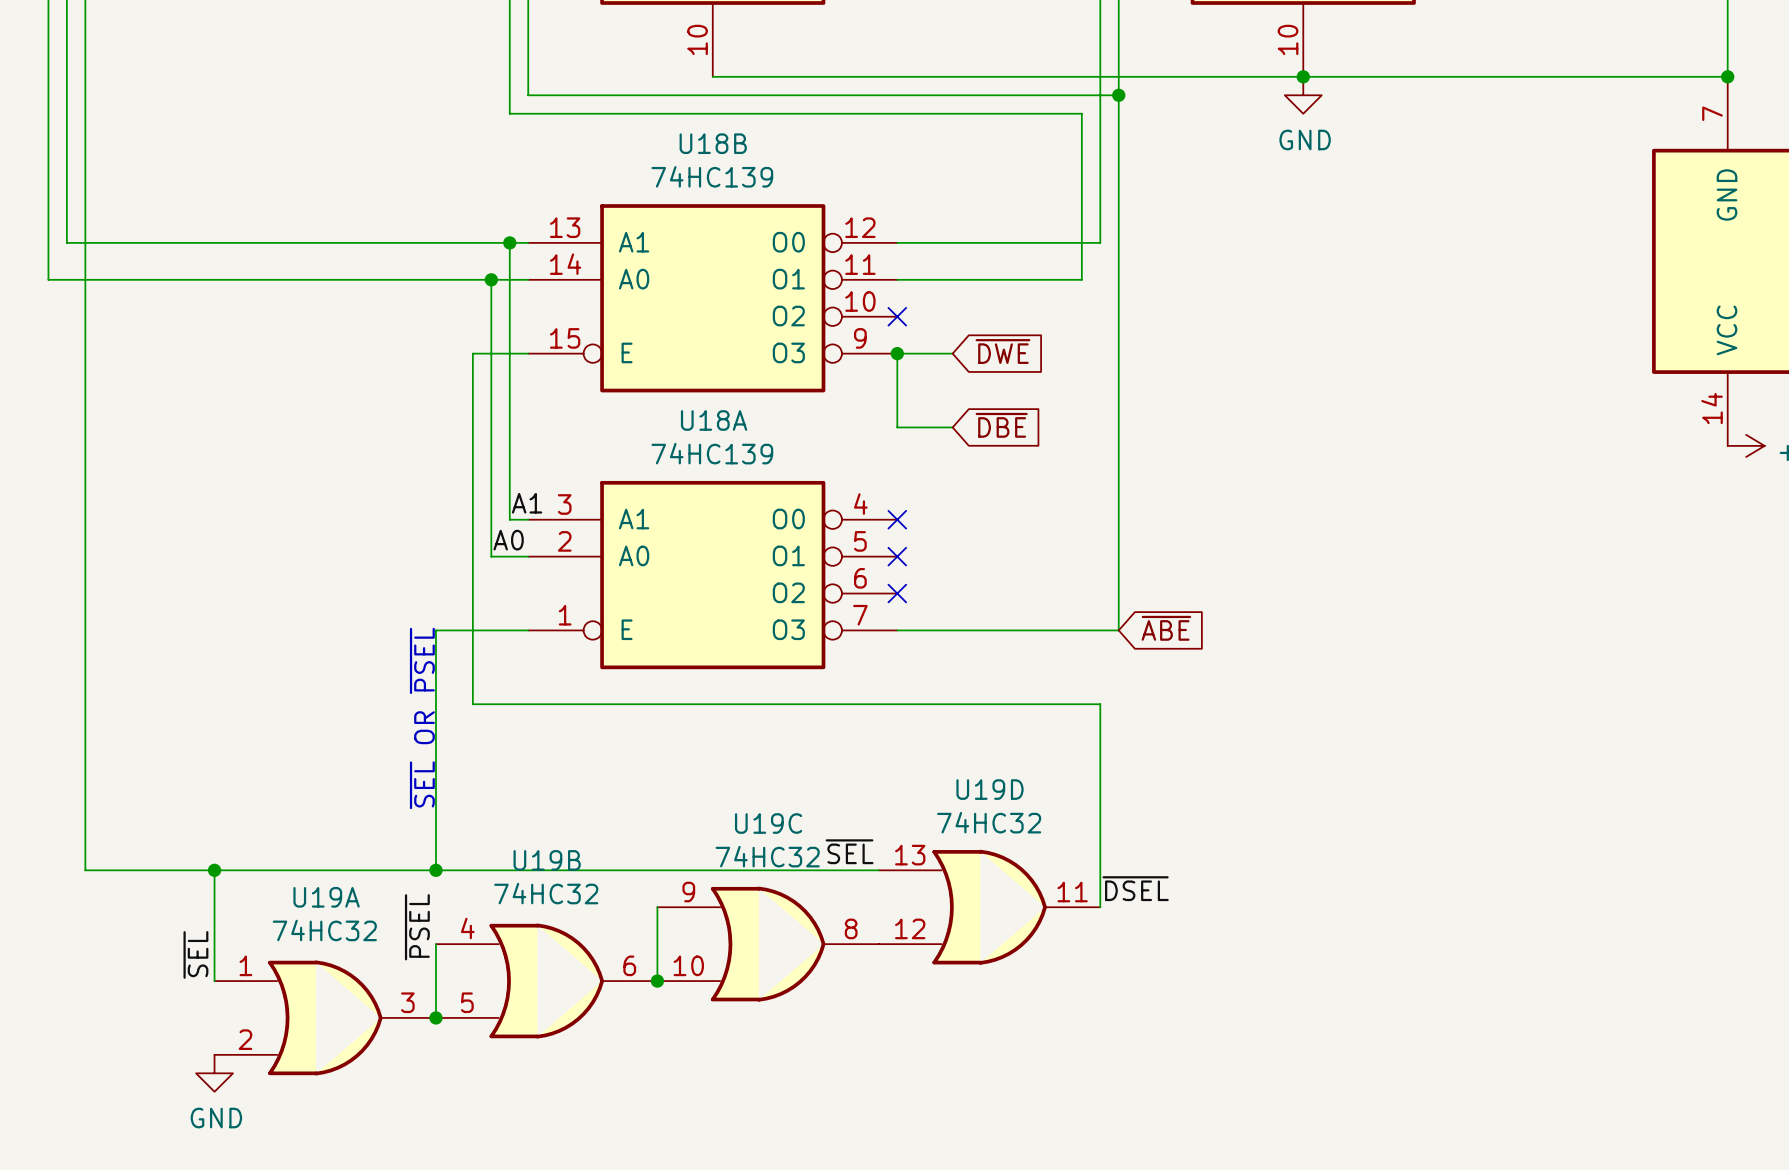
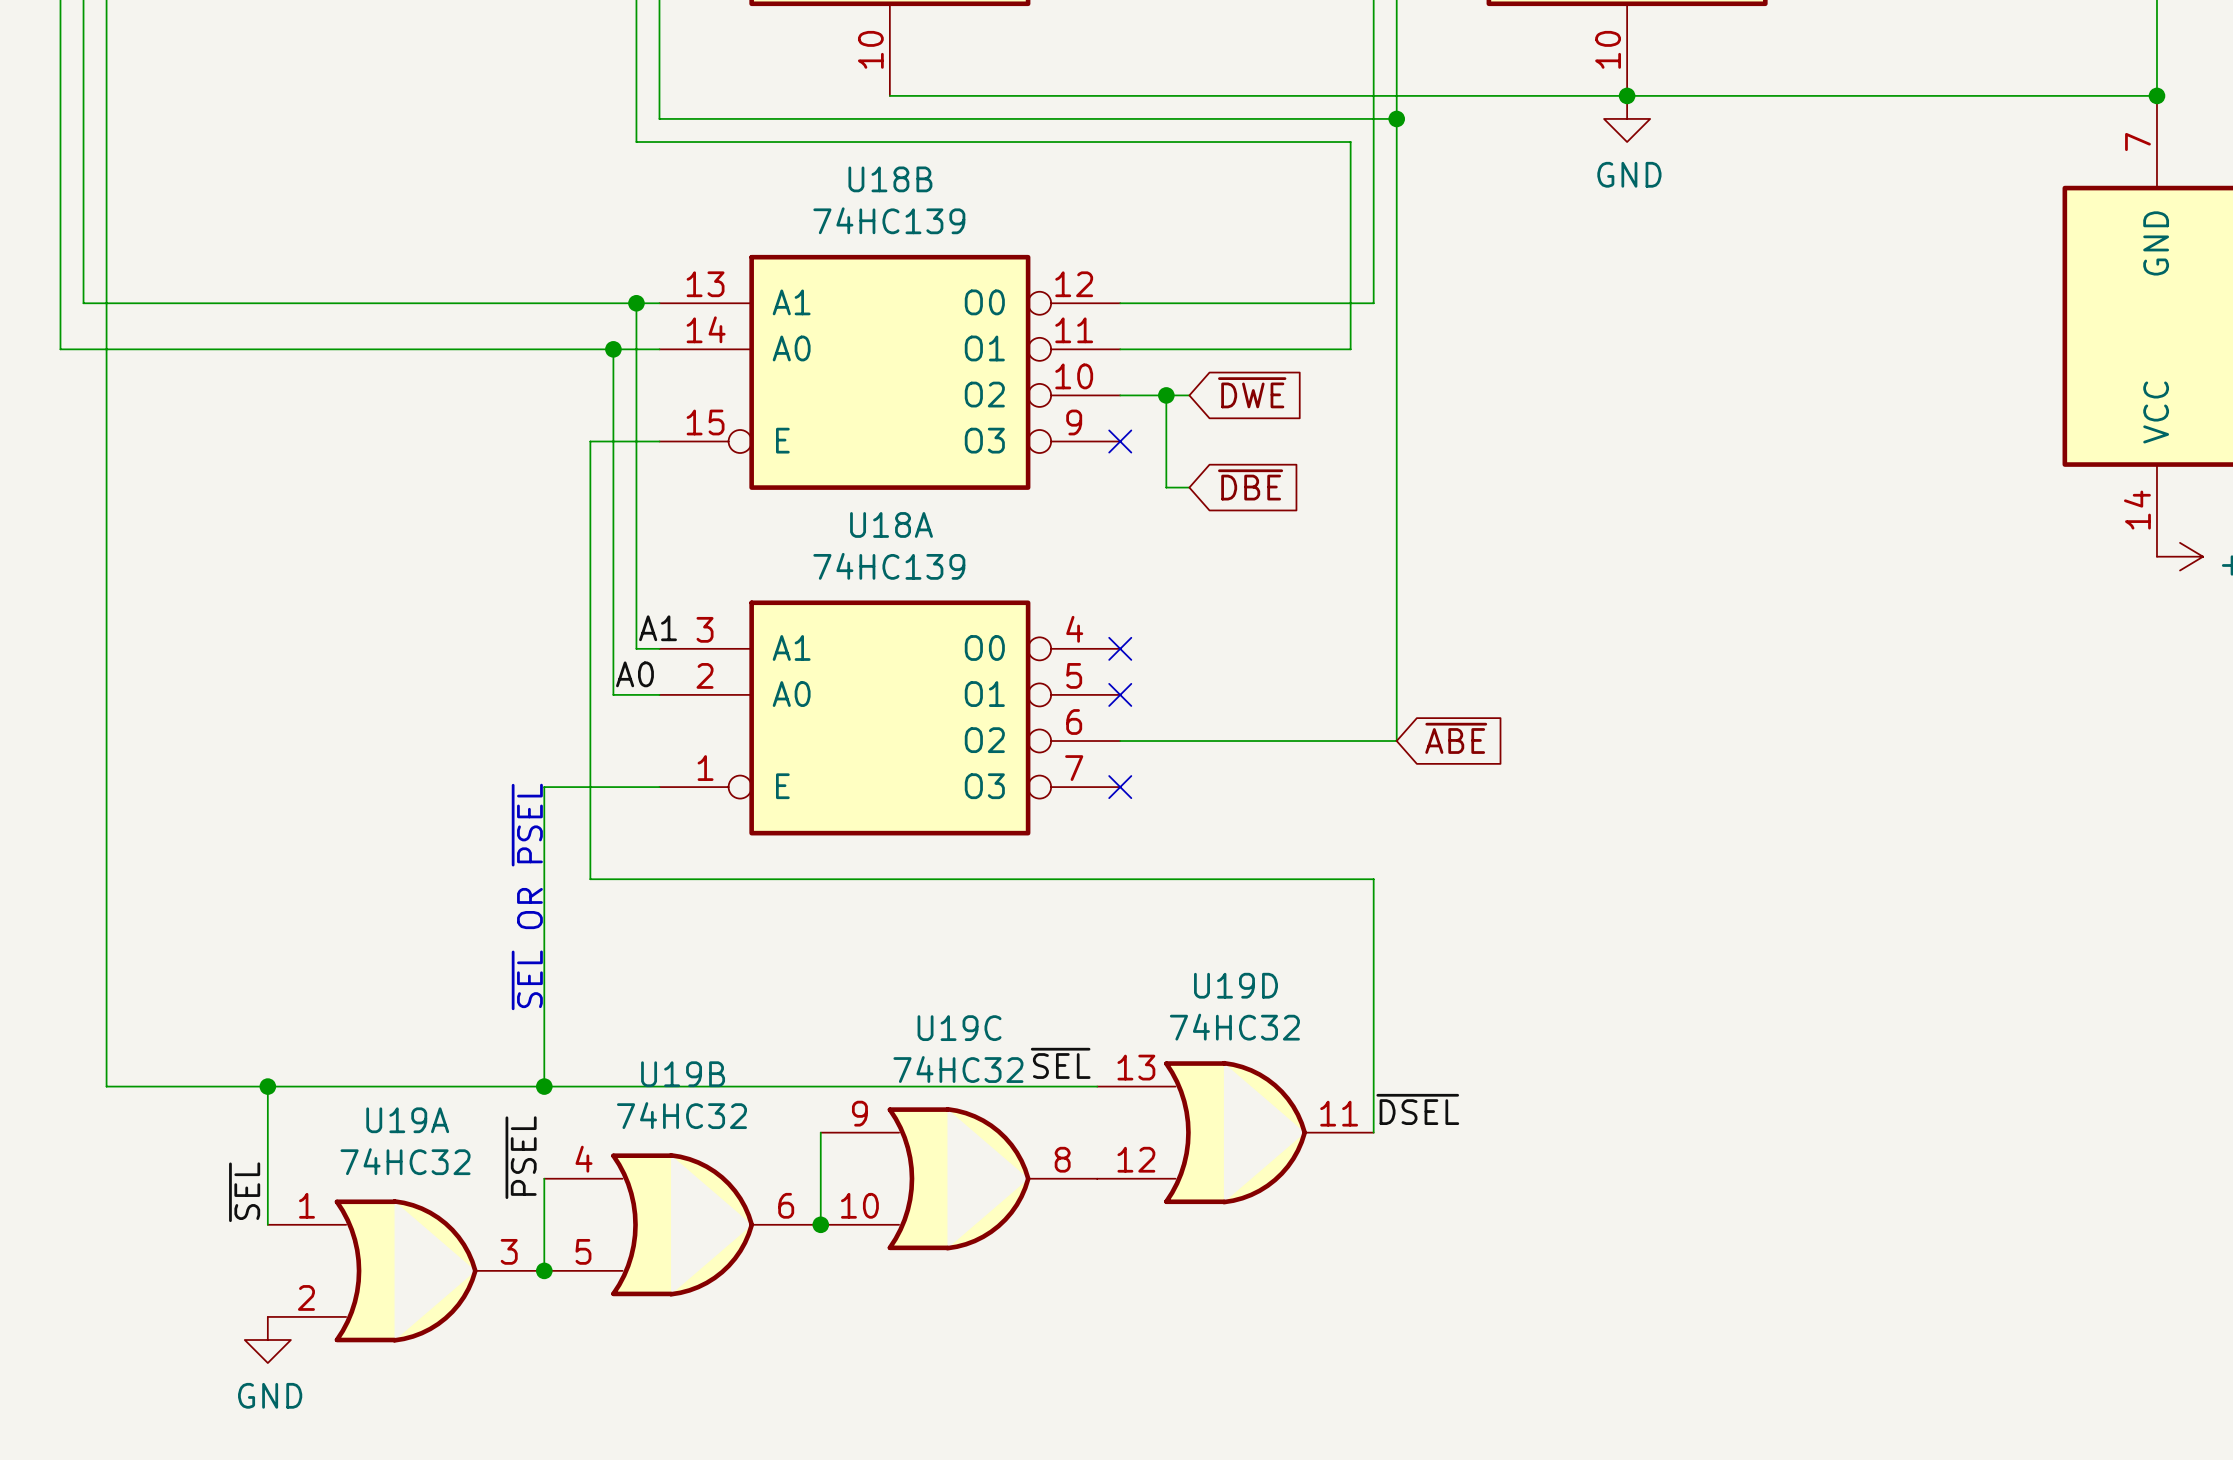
wire: none -> (1120, 395) (1189, 395)
no-connect mark position: (897, 316) -> (1120, 441)
wire: none -> (1166, 395) (1166, 487) (1189, 487)
global label position: ~{DWE} (1003, 351) -> ~{DWE} (1252, 392)
junction position: (897, 353) -> (1166, 395)
wire: (952, 353) (897, 353) (897, 427) (952, 427) -> none
global label position: ~{DBE} (1001, 425) -> ~{DBE} (1250, 484)
no-connect mark position: (897, 593) -> (1120, 787)
wire: (1118, 593) (1118, 630) (897, 630) -> (1396, 741) (1120, 741)
global label position: ~{ABE} (1166, 628) -> ~{ABE} (1456, 738)

